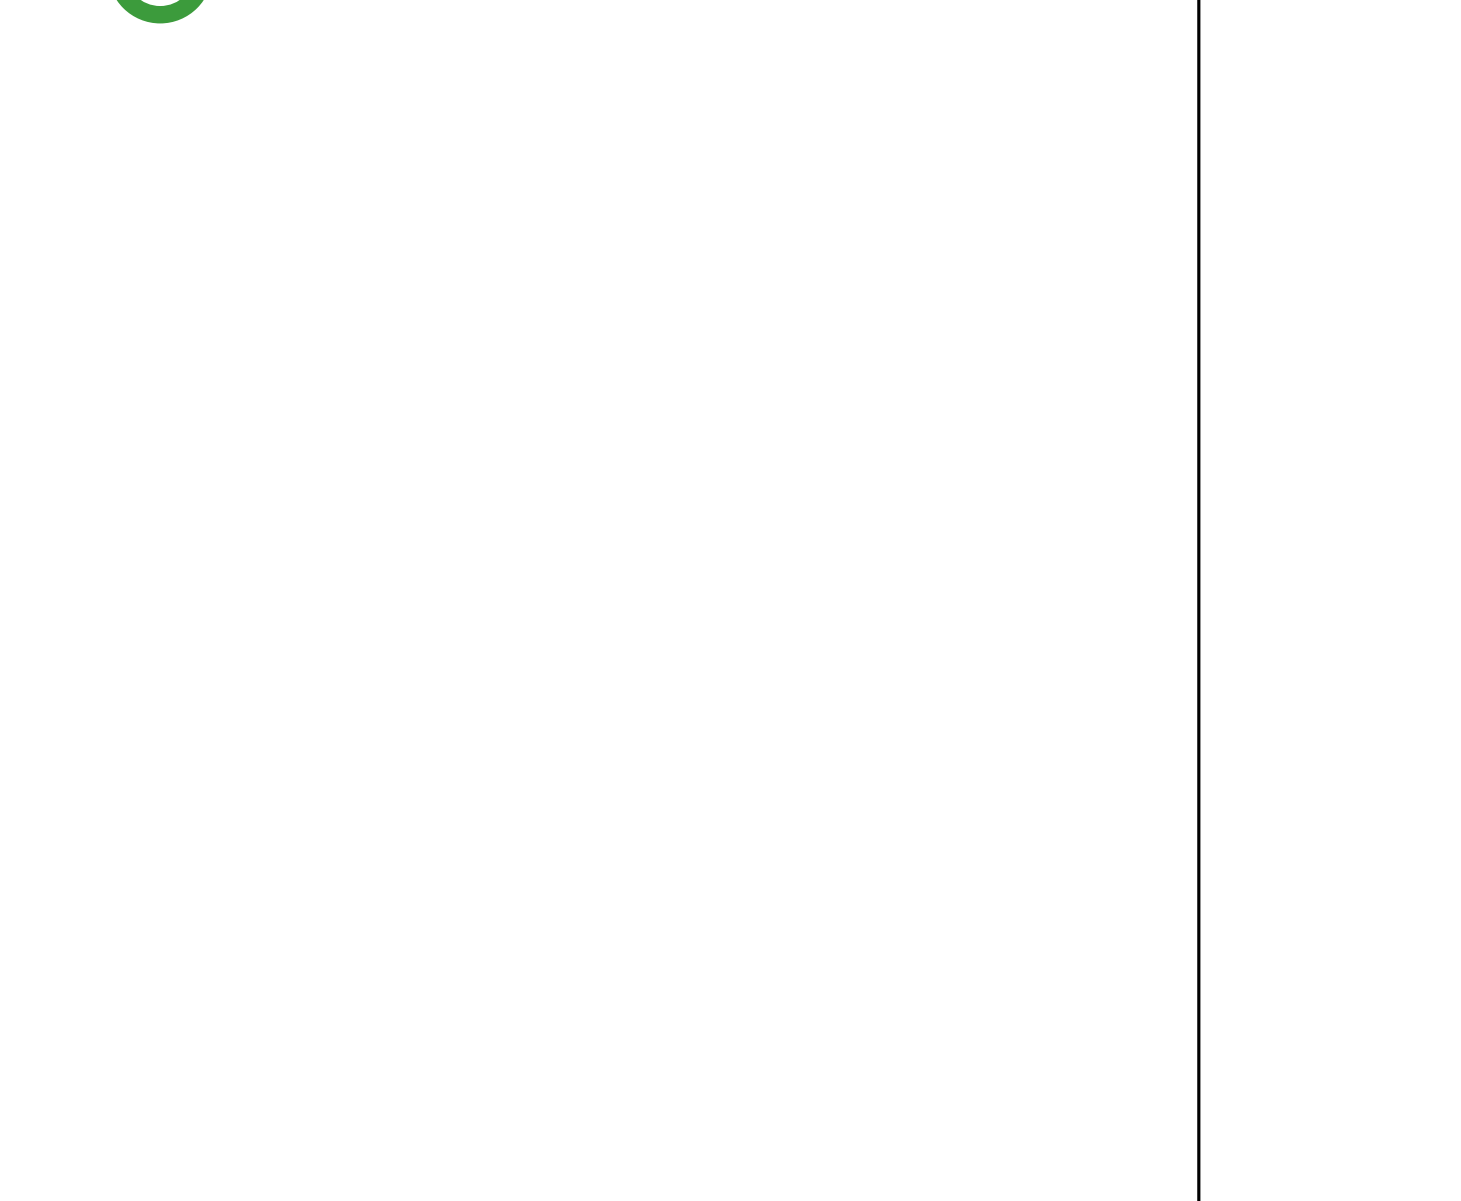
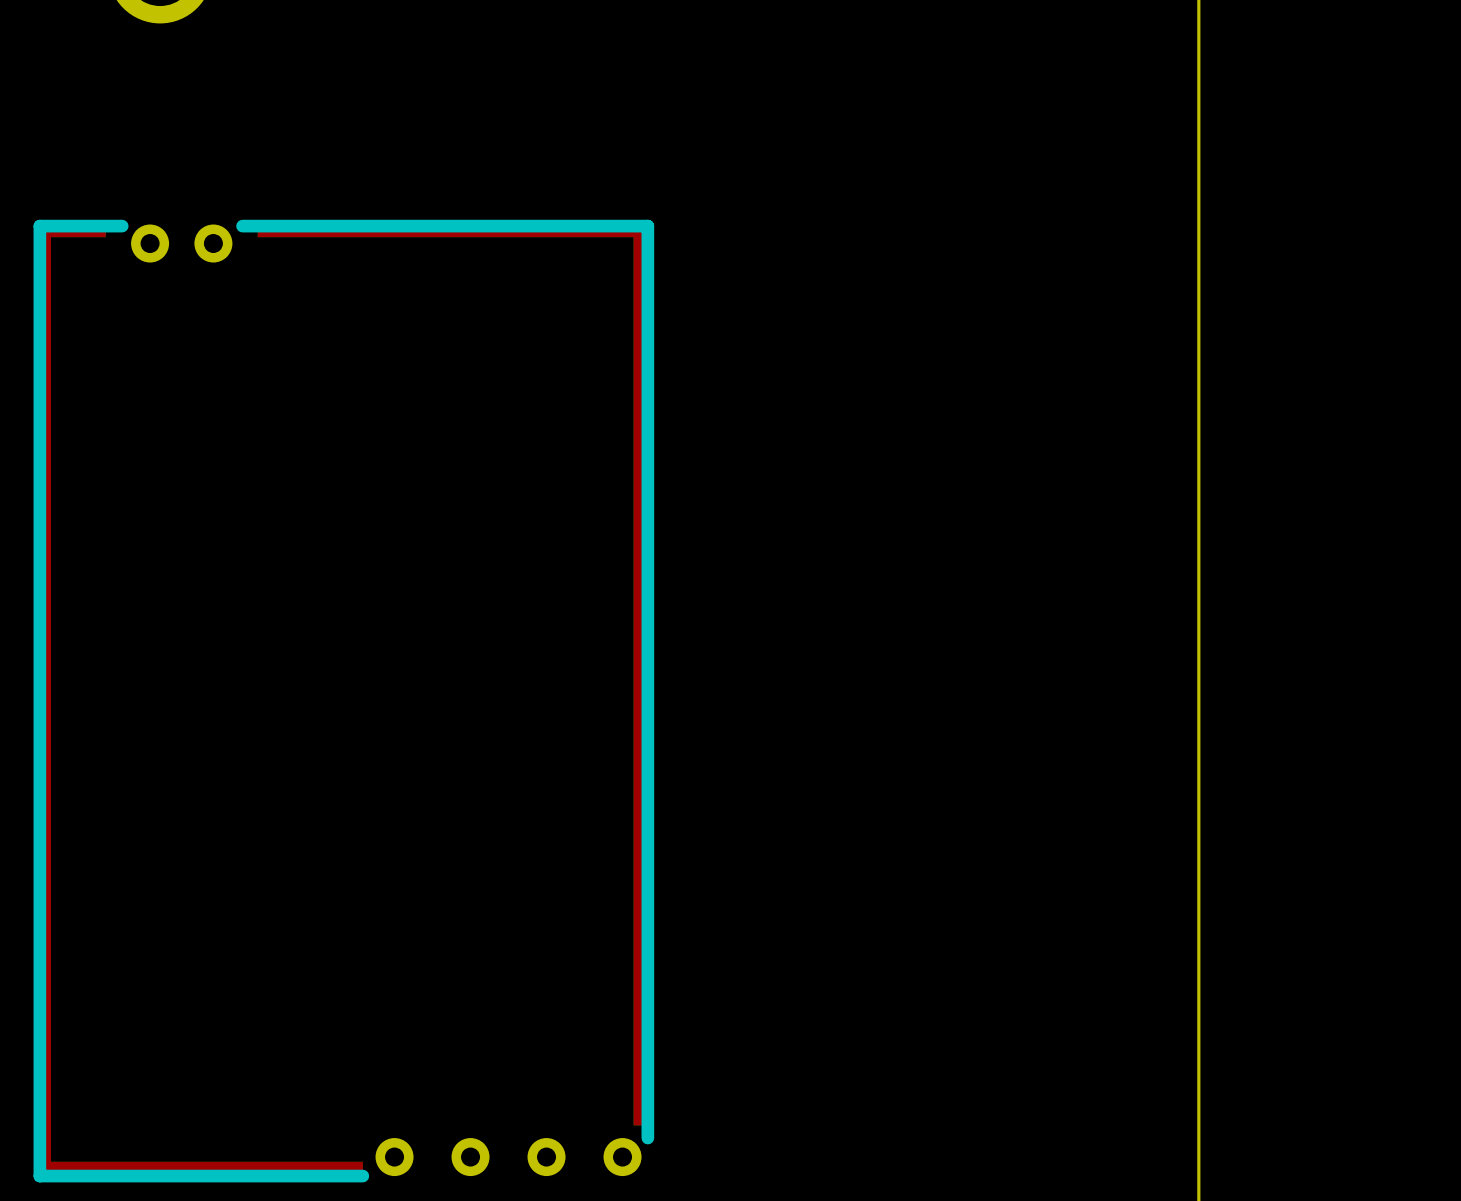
part: none -> (343, 701)

